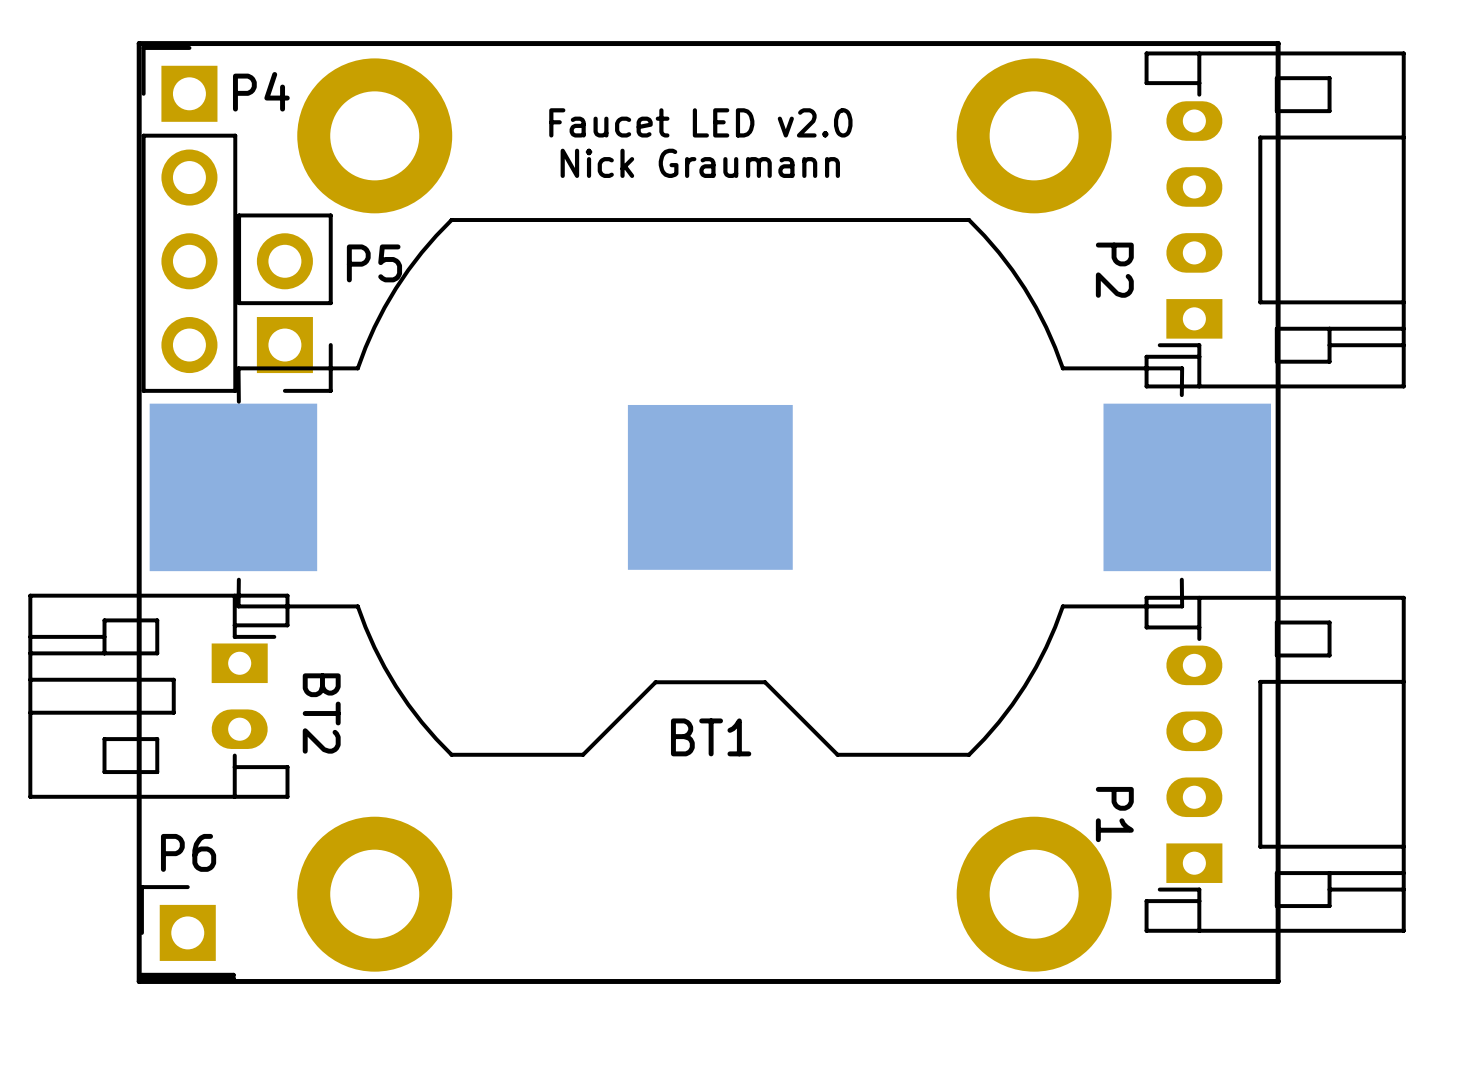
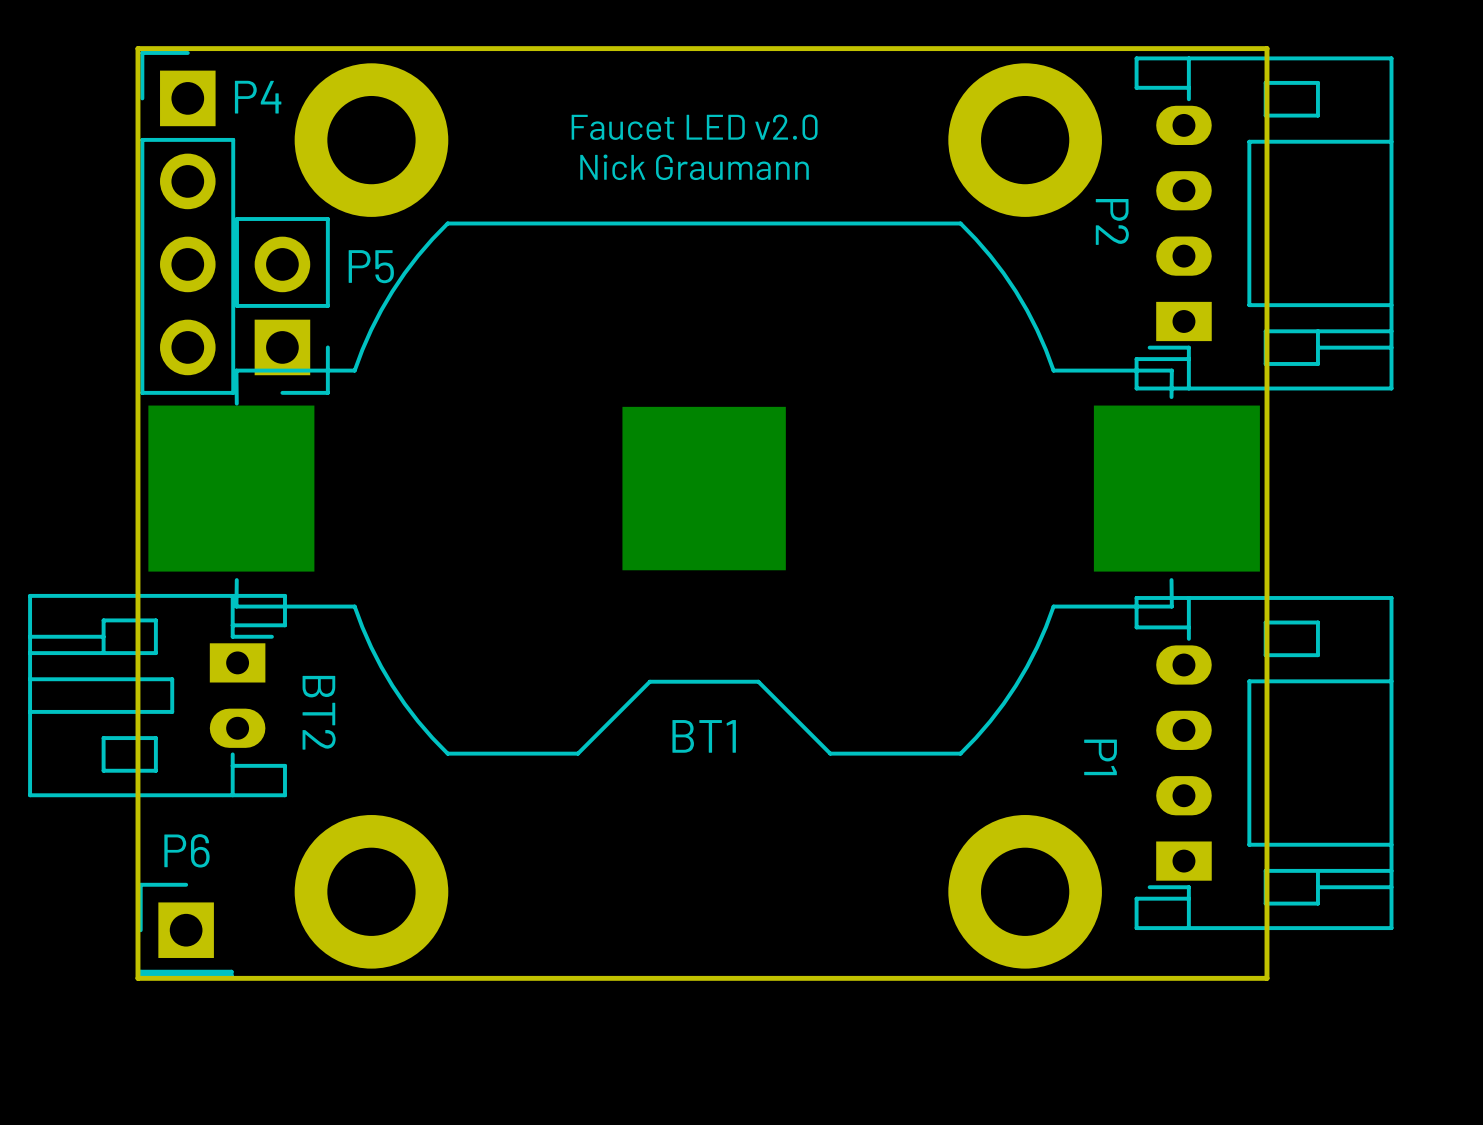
P2 name position: P2 (1114, 270) -> P2 (1112, 221)
P1 name position: P1 (1114, 814) -> P1 (1100, 757)

